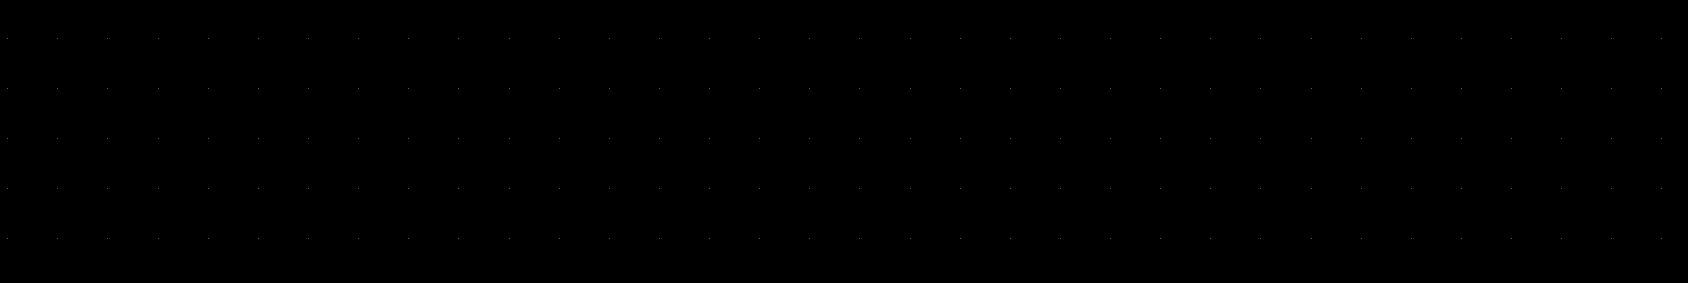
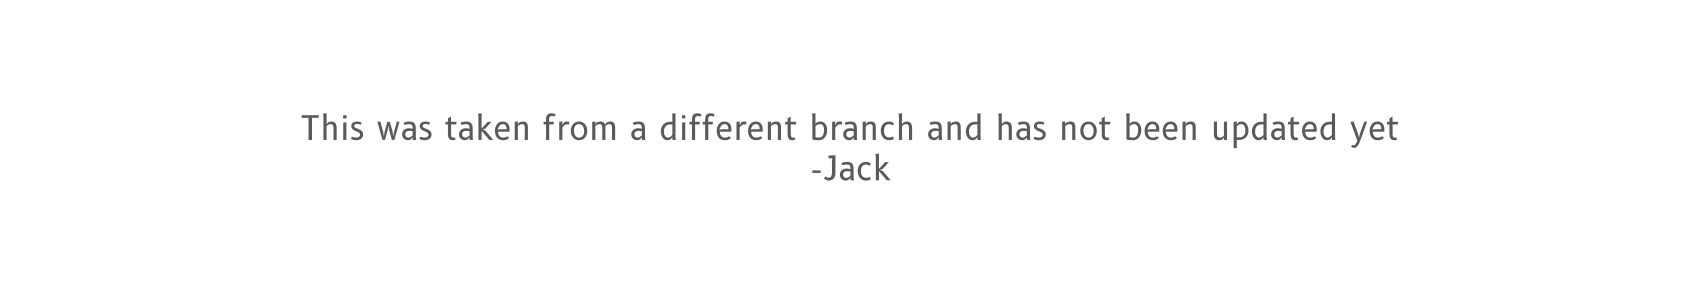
text: none -> This was taken from a different branch and has not been updated yet (849, 130)
text: none -> -Jack (851, 167)

